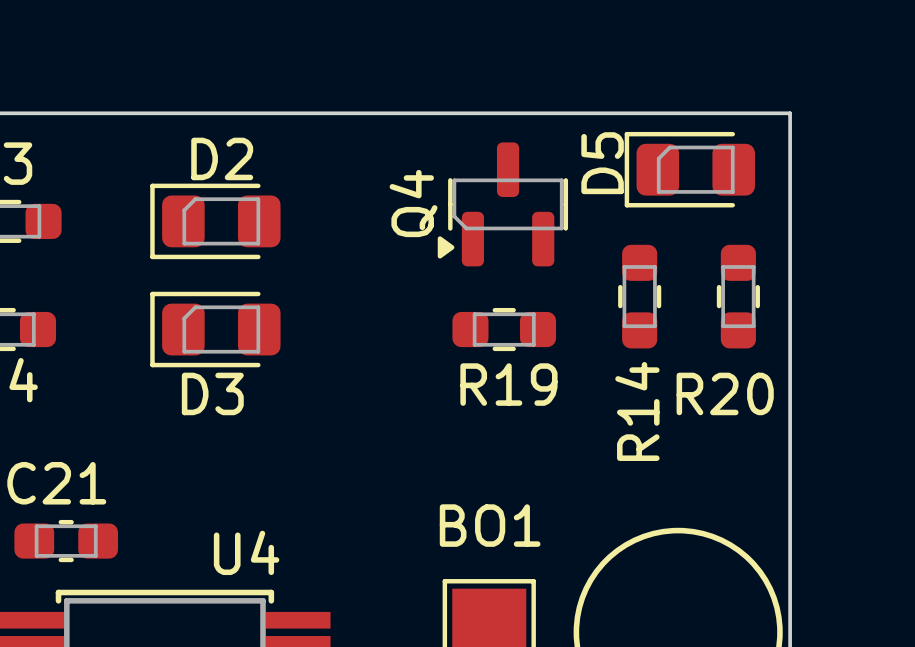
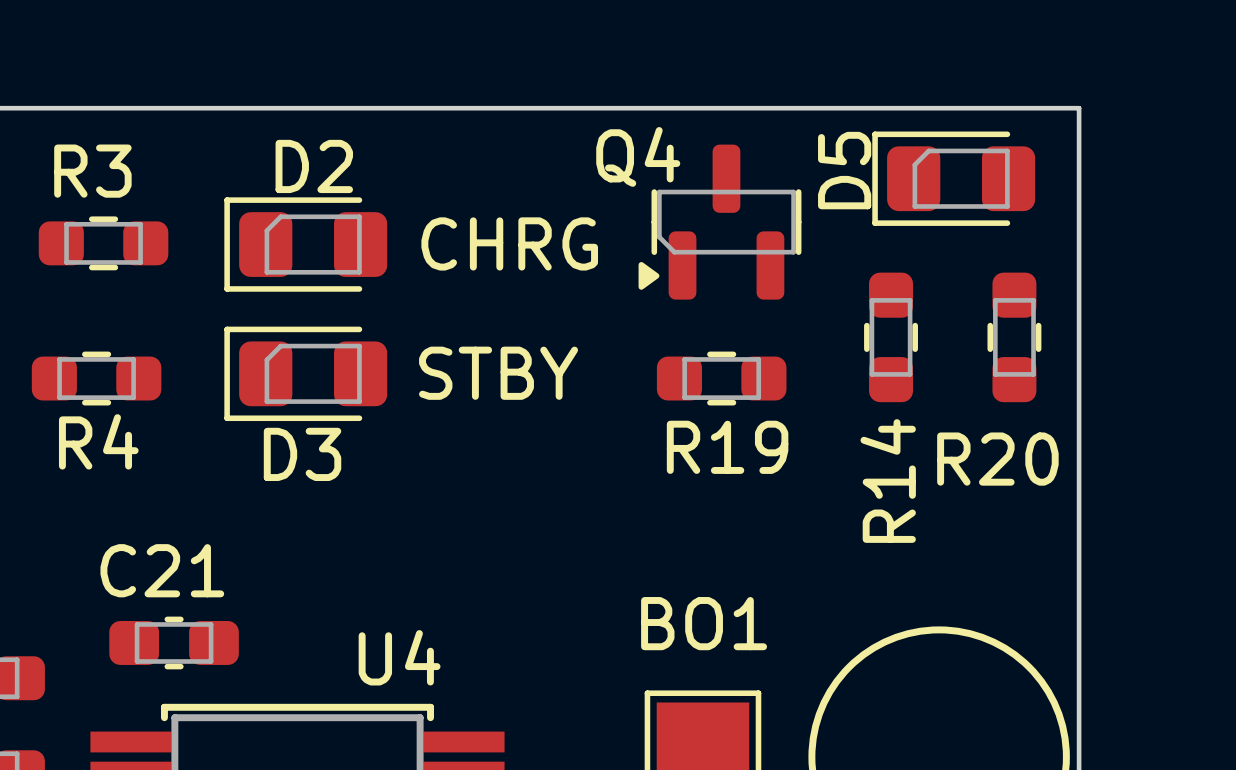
Q4 name rotation: 0° (413, 203) -> 90° clockwise (638, 156)
D2 position: (215, 221) -> (305, 244)
text: none -> CHRG (509, 243)
text: none -> STBY (498, 373)
D3 position: (215, 329) -> (305, 373)

